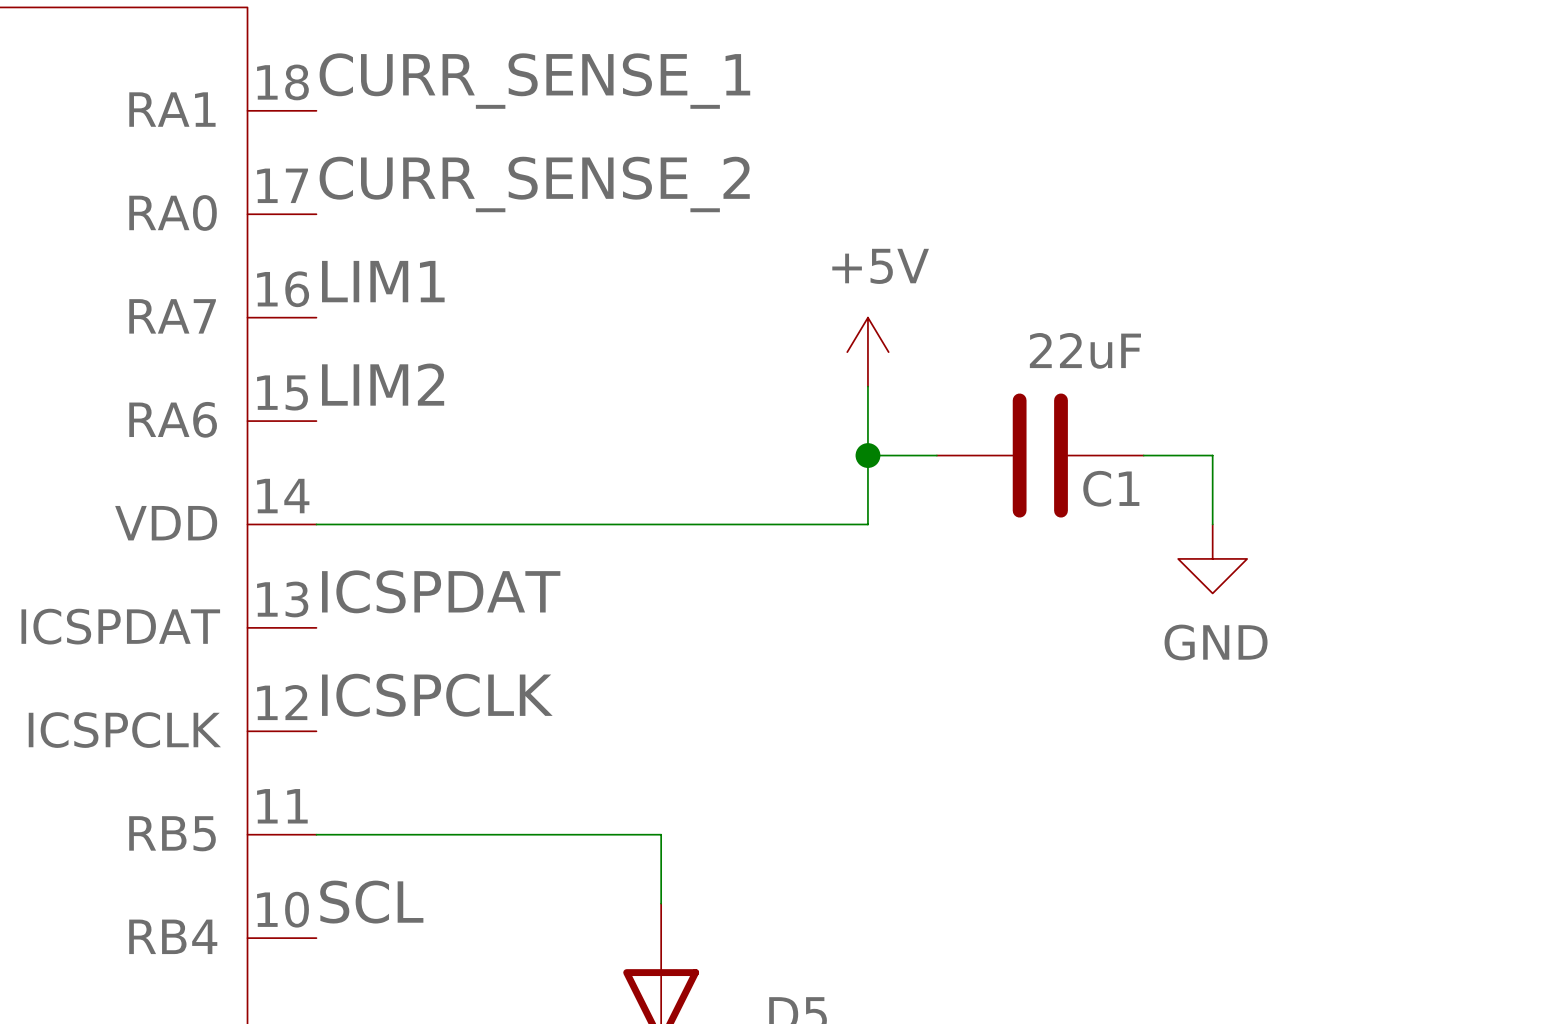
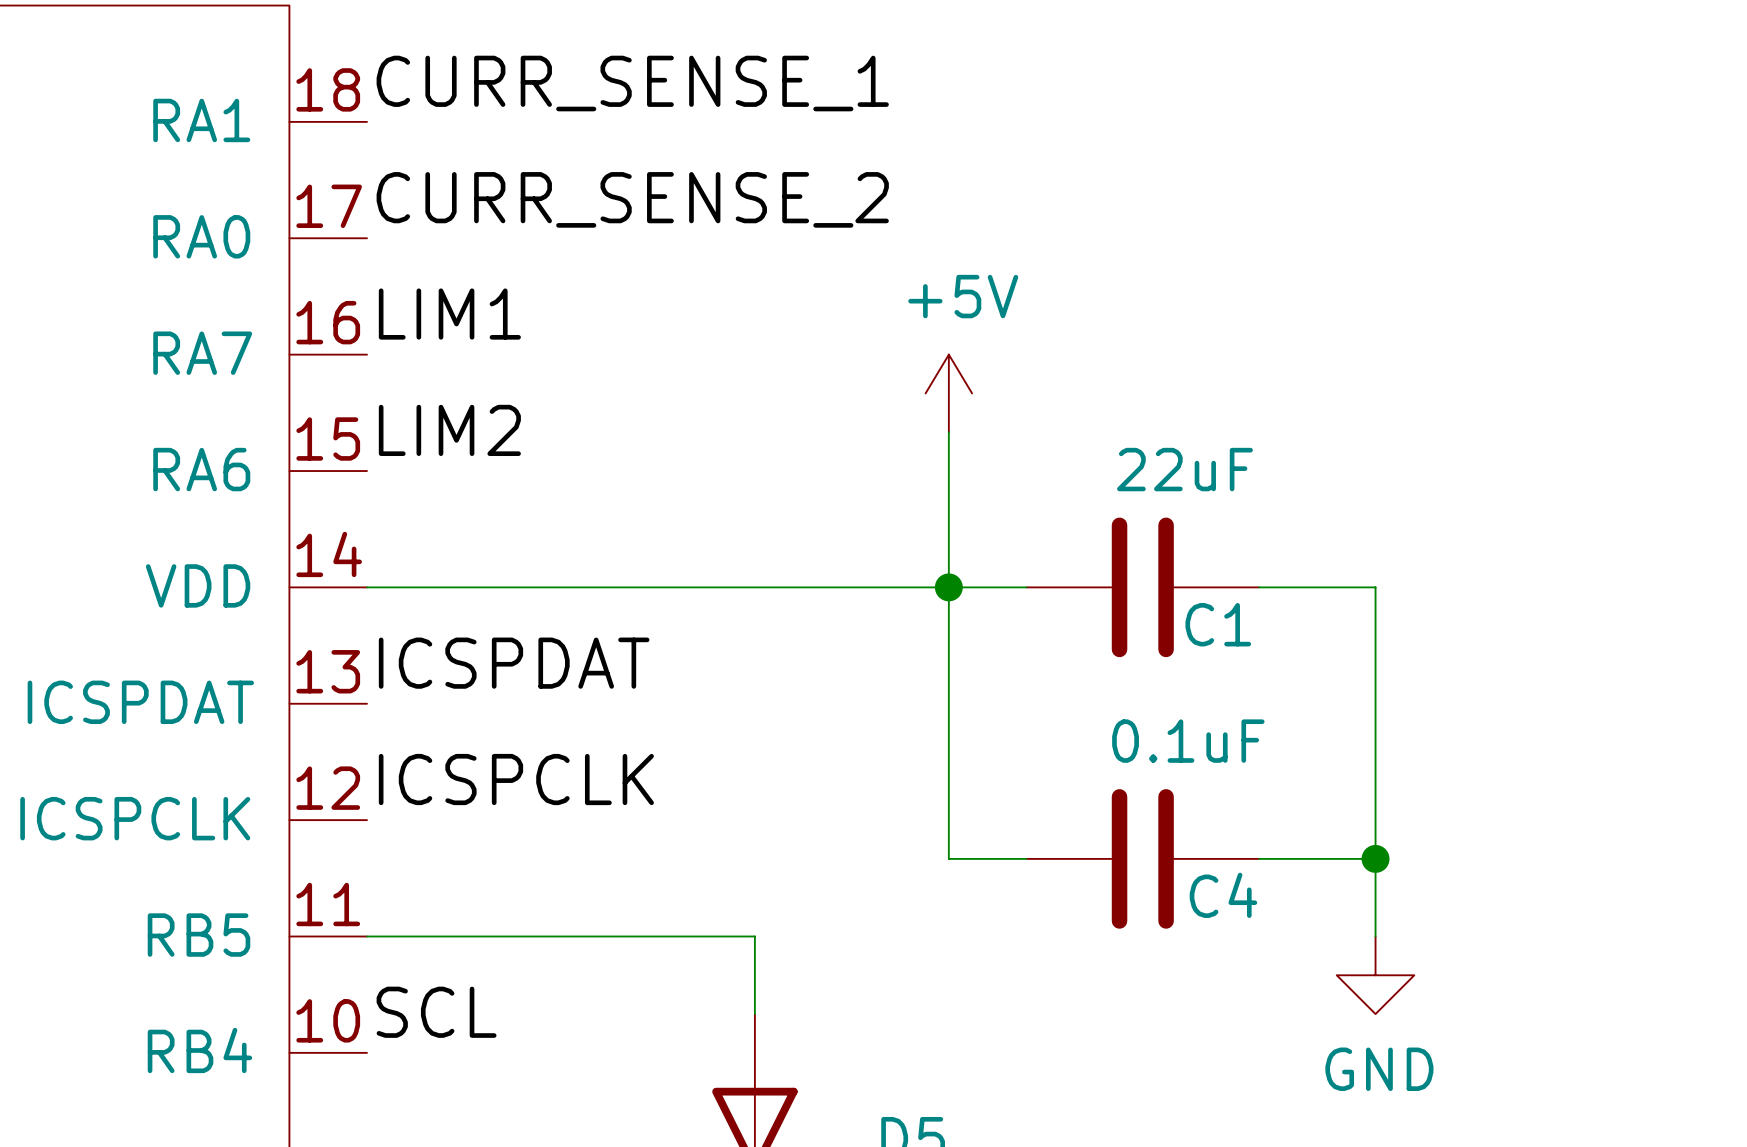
power symbol position: +5V (867, 352) -> +5V (948, 393)
wire: none -> (948, 432) (948, 858) (1026, 858)
wire: (867, 386) (867, 524) -> (1026, 587) (987, 587)
wire: (867, 455) (936, 455) -> none
junction position: (867, 455) -> (948, 587)
C1 position: (1040, 455) -> (1142, 587)
wire: (1143, 455) (1212, 455) (1212, 524) -> none
wire: none -> (1259, 587) (1375, 587) (1375, 936)
power symbol position: GND (1212, 558) -> GND (1375, 975)
C4: none -> 0.1uF (1142, 858)
wire: none -> (1259, 858) (1375, 858)
junction: none -> (1375, 858)

